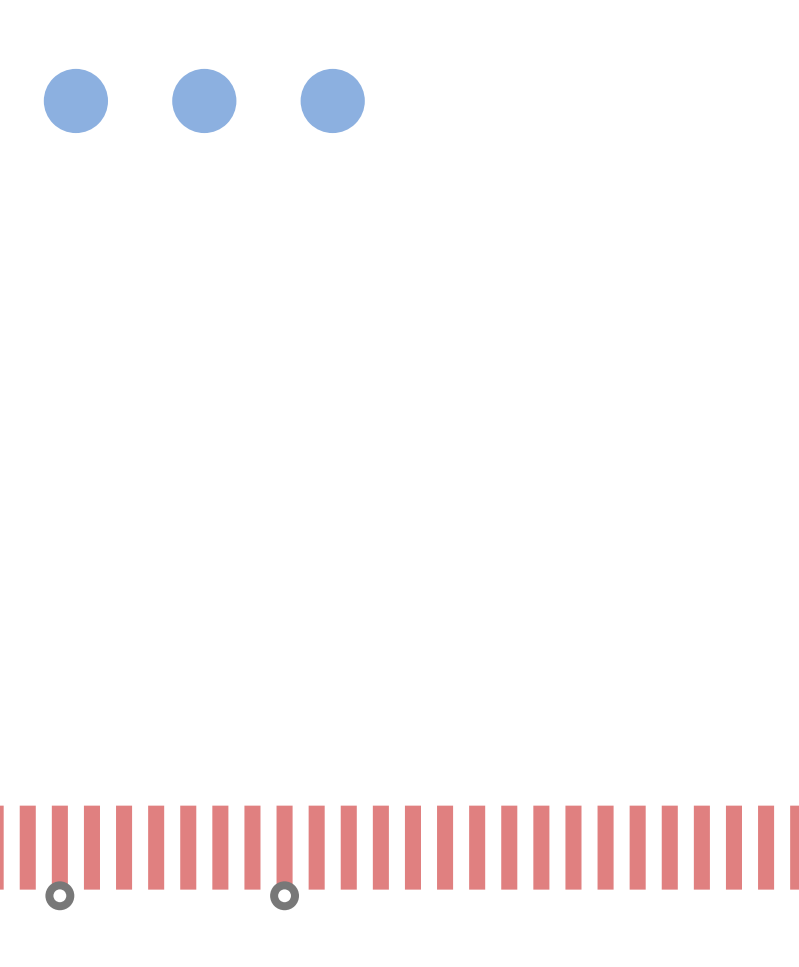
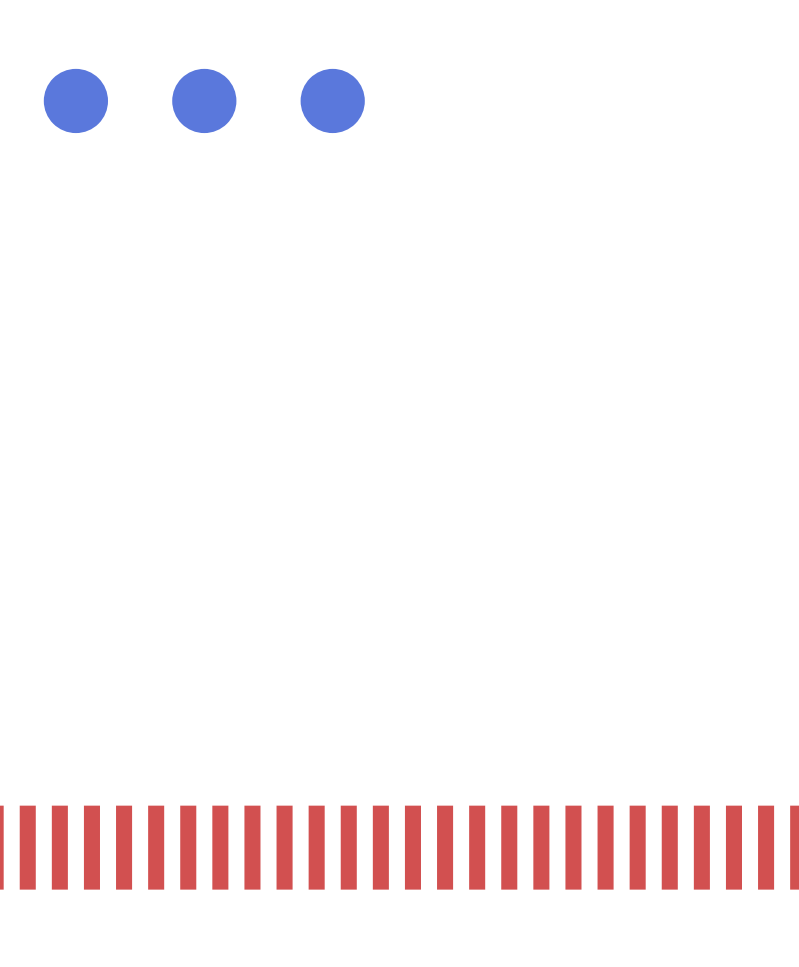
via: (59, 895) -> none
via: (284, 895) -> none

